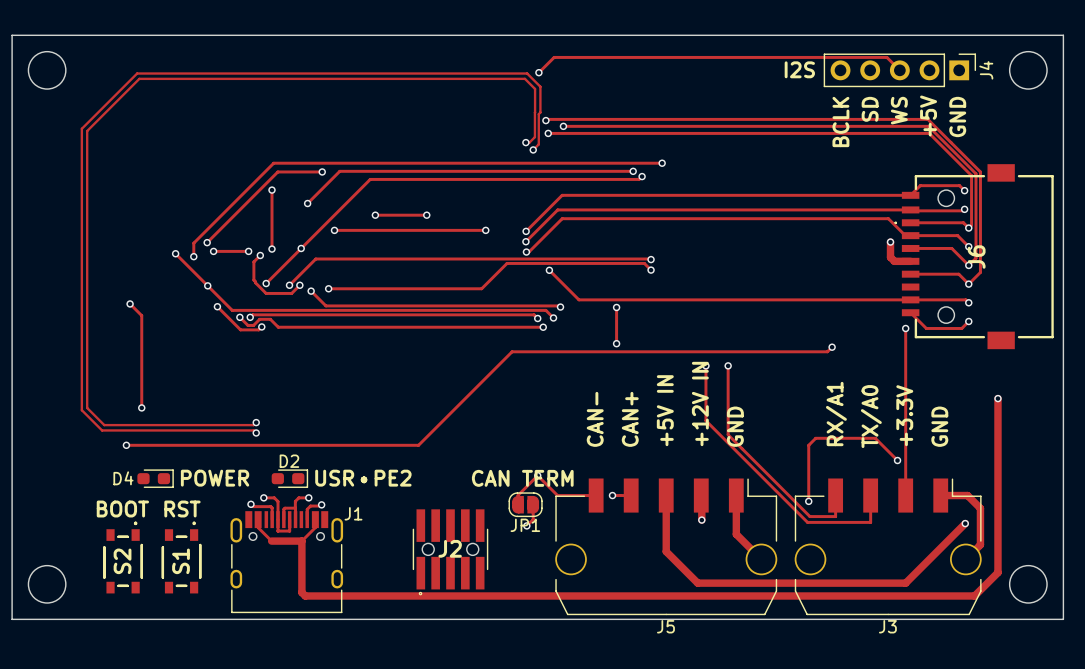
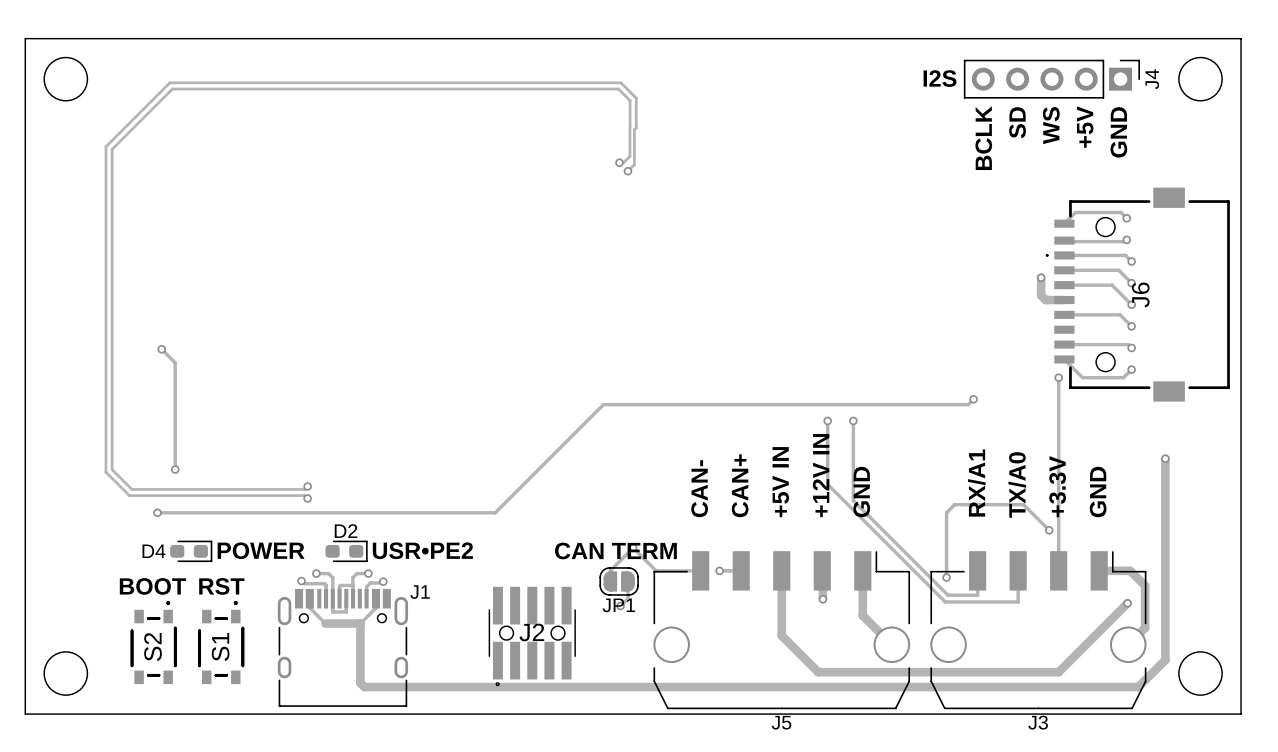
track: (899, 70) (886, 57) (554, 57) (538, 72) -> none
via: (538, 72) -> none
track: (545, 120) (927, 119) (980, 171) (980, 272) (968, 284) -> none
via: (545, 120) -> none
track: (563, 126) (928, 126) (976, 173) (976, 258) (968, 265) -> none
via: (563, 126) -> none
track: (548, 133) (929, 133) (971, 175) (971, 225) (968, 228) -> none
via: (548, 133) -> none
track: (662, 163) (273, 163) (193, 243) (193, 256) -> none
via: (662, 163) -> none
track: (322, 171) (277, 171) (207, 242) -> none
via: (322, 171) -> none
track: (633, 171) (339, 171) (307, 203) -> none
via: (633, 171) -> none
track: (642, 176) (639, 179) (370, 179) (266, 283) -> none
via: (642, 176) -> none
track: (272, 190) (272, 249) -> none
via: (272, 190) -> none
track: (910, 195) (562, 195) (526, 231) -> none
via: (307, 203) -> none
track: (910, 209) (557, 209) (525, 241) -> none
track: (375, 215) (426, 215) -> none
via: (375, 215) -> none
via: (426, 215) -> none
track: (334, 230) (485, 230) -> none
via: (334, 230) -> none
via: (485, 230) -> none
via: (526, 231) -> none
track: (910, 235) (905, 235) (888, 218) (562, 218) (528, 252) (526, 252) -> none
via: (525, 241) -> none
via: (207, 242) -> none
via: (301, 248) -> none
via: (272, 249) -> none
track: (213, 251) (248, 251) -> none
via: (213, 251) -> none
via: (248, 251) -> none
via: (526, 252) -> none
track: (175, 253) (232, 310) (545, 310) (553, 317) -> none
via: (175, 253) -> none
track: (260, 255) (253, 261) (253, 280) (266, 293) (291, 293) (299, 285) -> none
via: (260, 255) -> none
via: (193, 256) -> none
track: (651, 259) (315, 258) (289, 285) -> none
via: (651, 259) -> none
track: (549, 270) (578, 299) (910, 299) -> none
via: (549, 270) -> none
track: (651, 270) (644, 263) (507, 263) (481, 288) (328, 288) -> none
via: (651, 270) -> none
via: (266, 283) -> none
via: (207, 285) -> none
via: (289, 285) -> none
via: (299, 285) -> none
via: (328, 288) -> none
track: (311, 291) (325, 305) (560, 307) -> none
via: (311, 291) -> none
track: (217, 306) (240, 329) (258, 329) (261, 326) -> none
via: (217, 306) -> none
via: (560, 307) -> none
track: (616, 307) (616, 343) -> none
via: (616, 307) -> none
track: (239, 317) (247, 325) (253, 325) (259, 319) (270, 319) (278, 327) (543, 327) -> none
via: (239, 317) -> none
track: (250, 317) (252, 314) (534, 314) (537, 318) -> none
via: (250, 317) -> none
via: (553, 317) -> none
via: (537, 318) -> none
via: (261, 326) -> none
via: (543, 327) -> none
via: (616, 343) -> none

